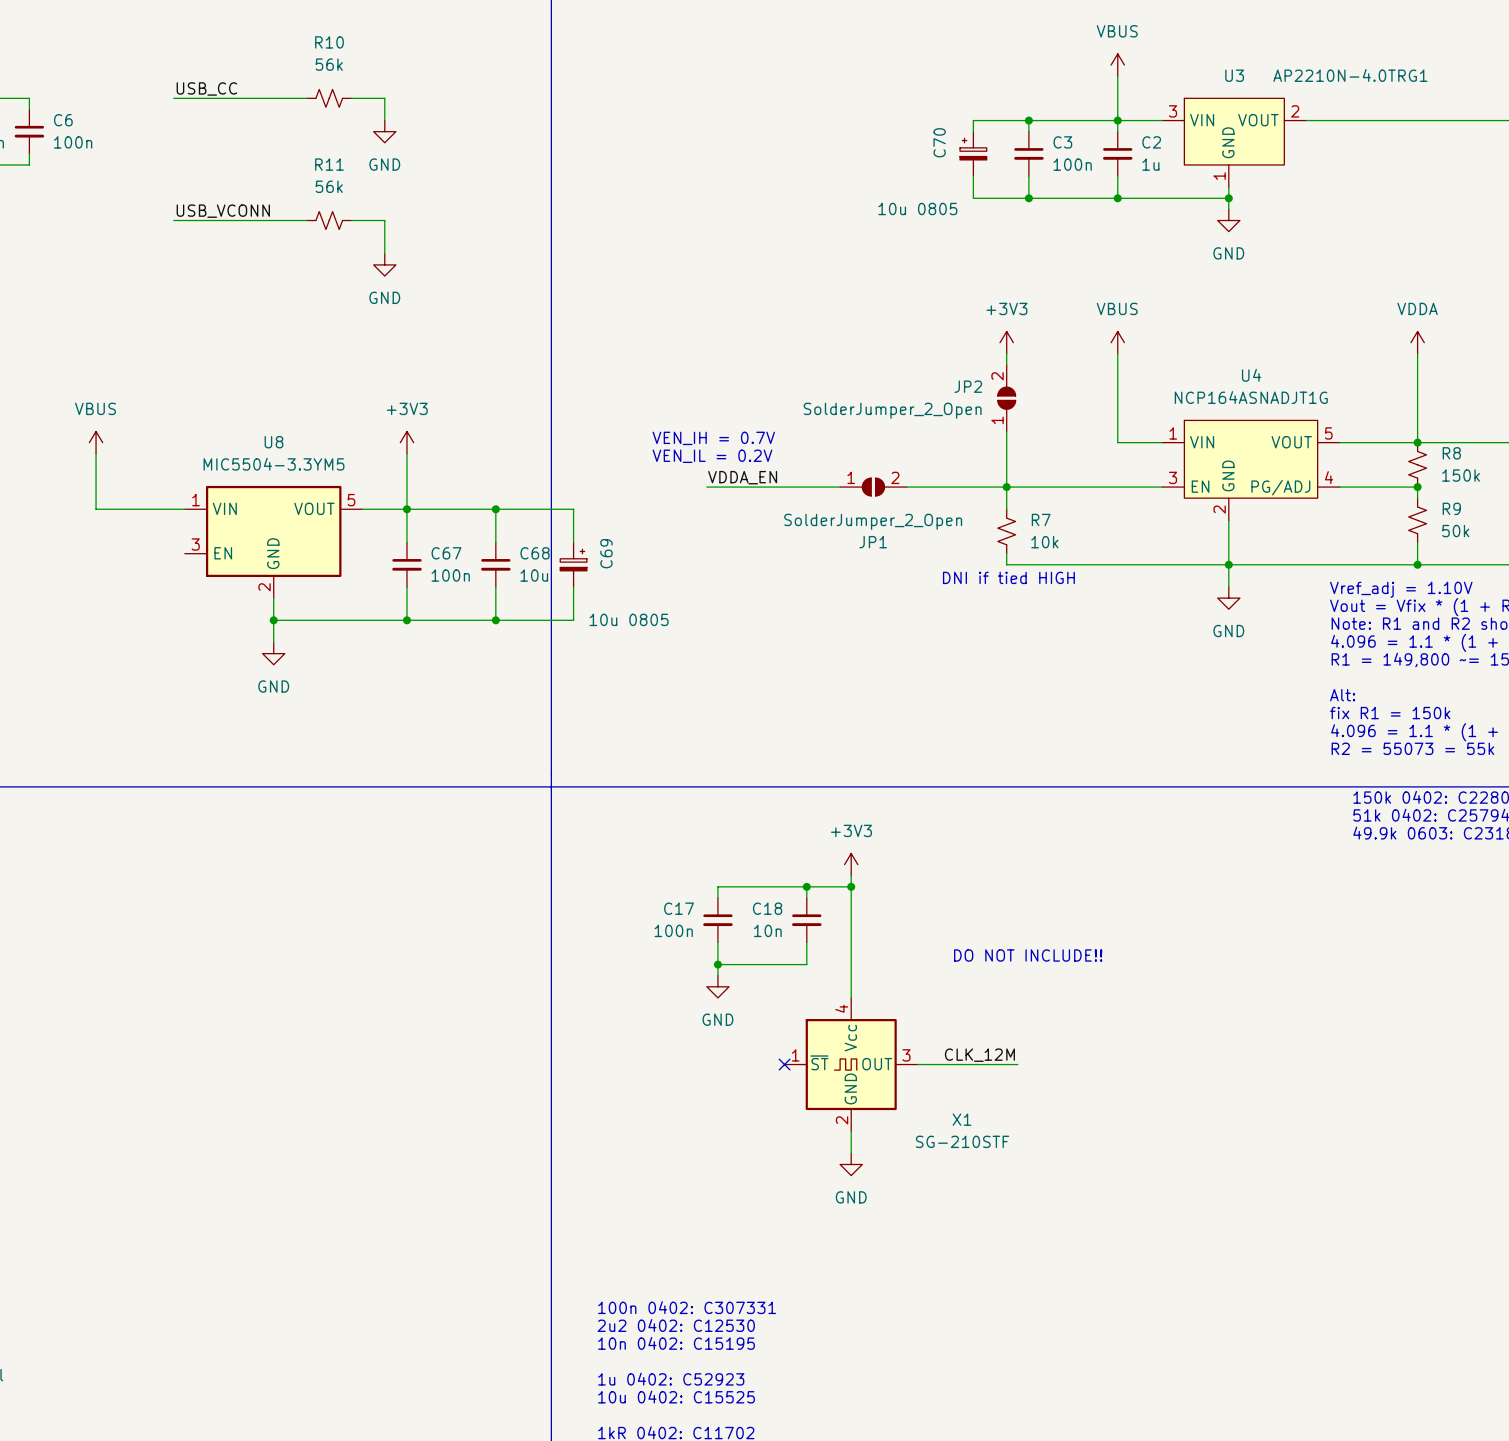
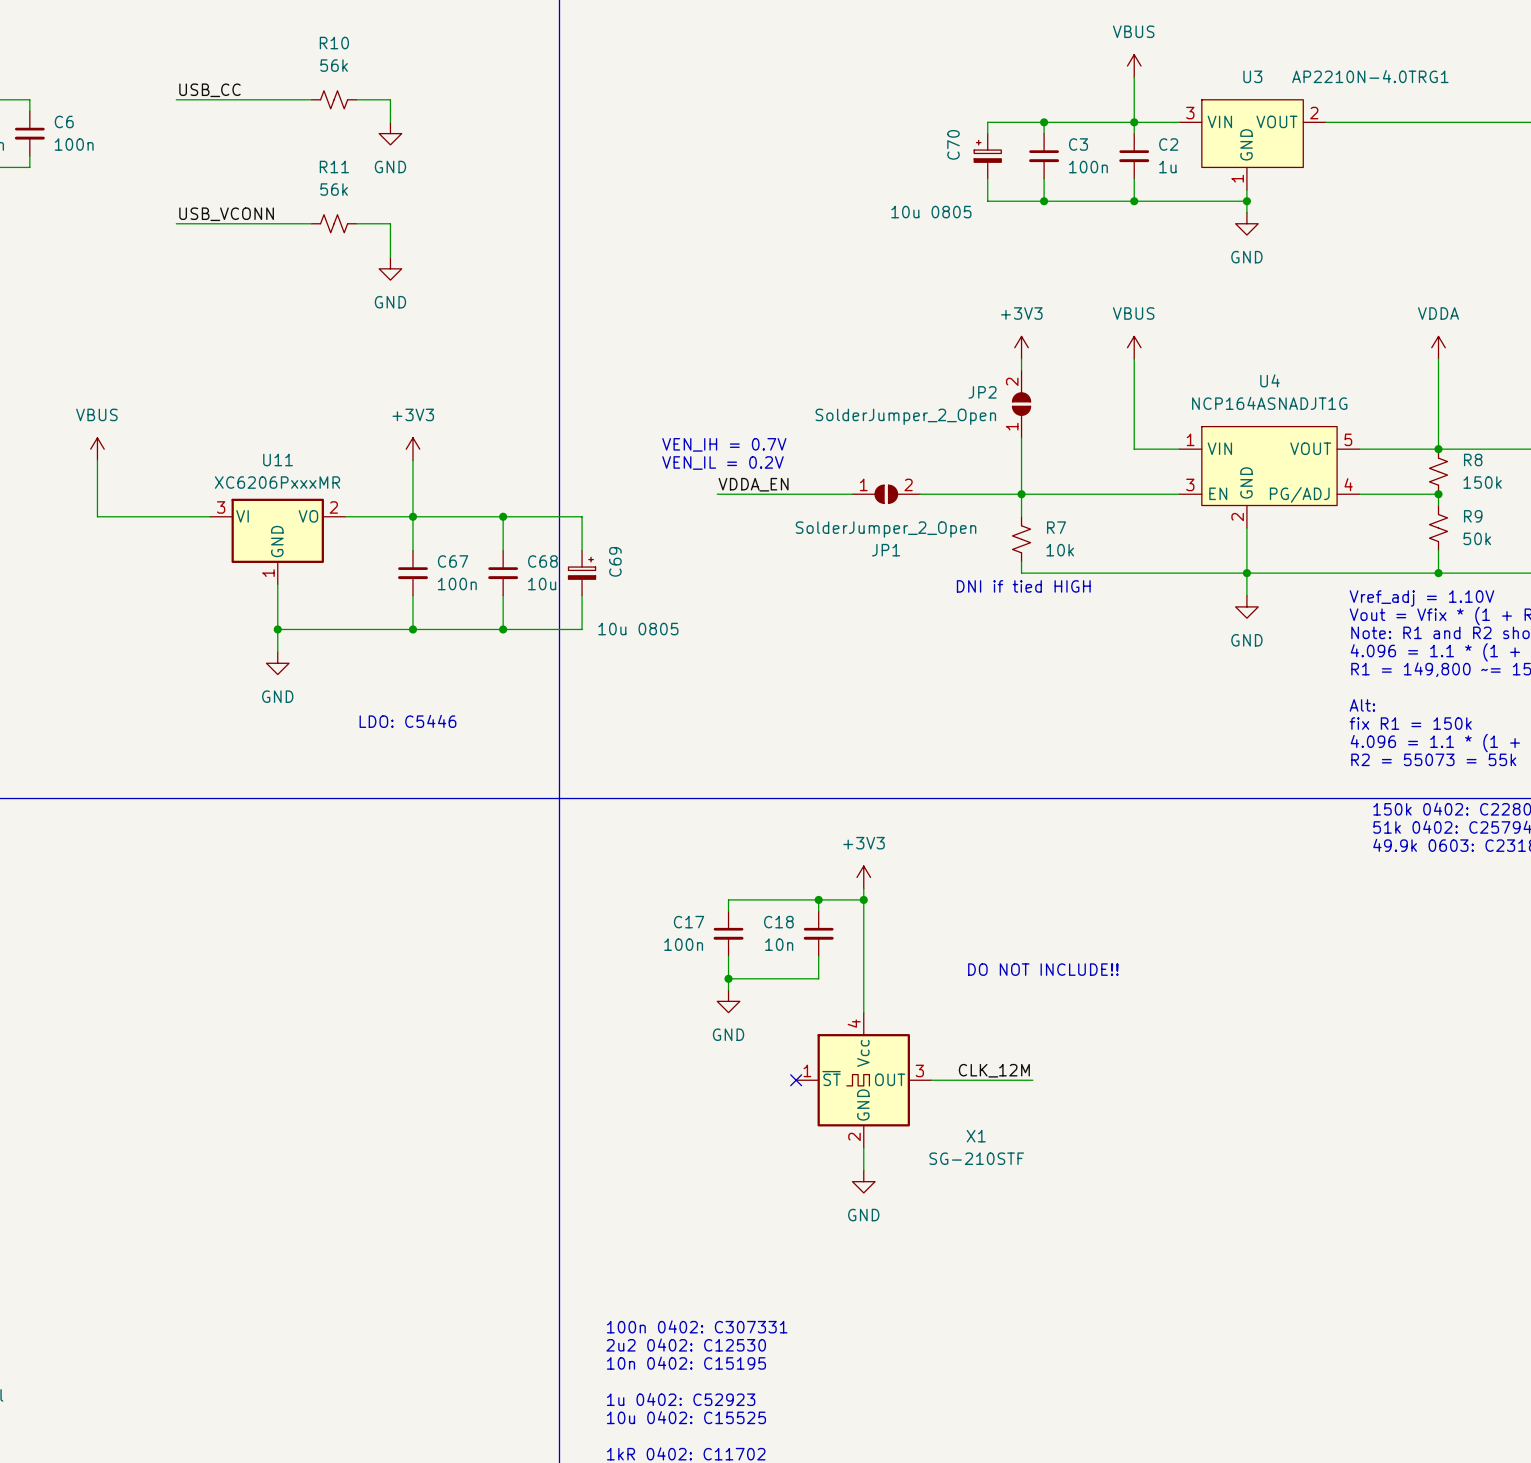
U11: none -> XC6206PxxxMR (277, 541)
U8: MIC5504-3.3YM5 (273, 542) -> none
text: none -> LDO: C5446 (407, 721)

